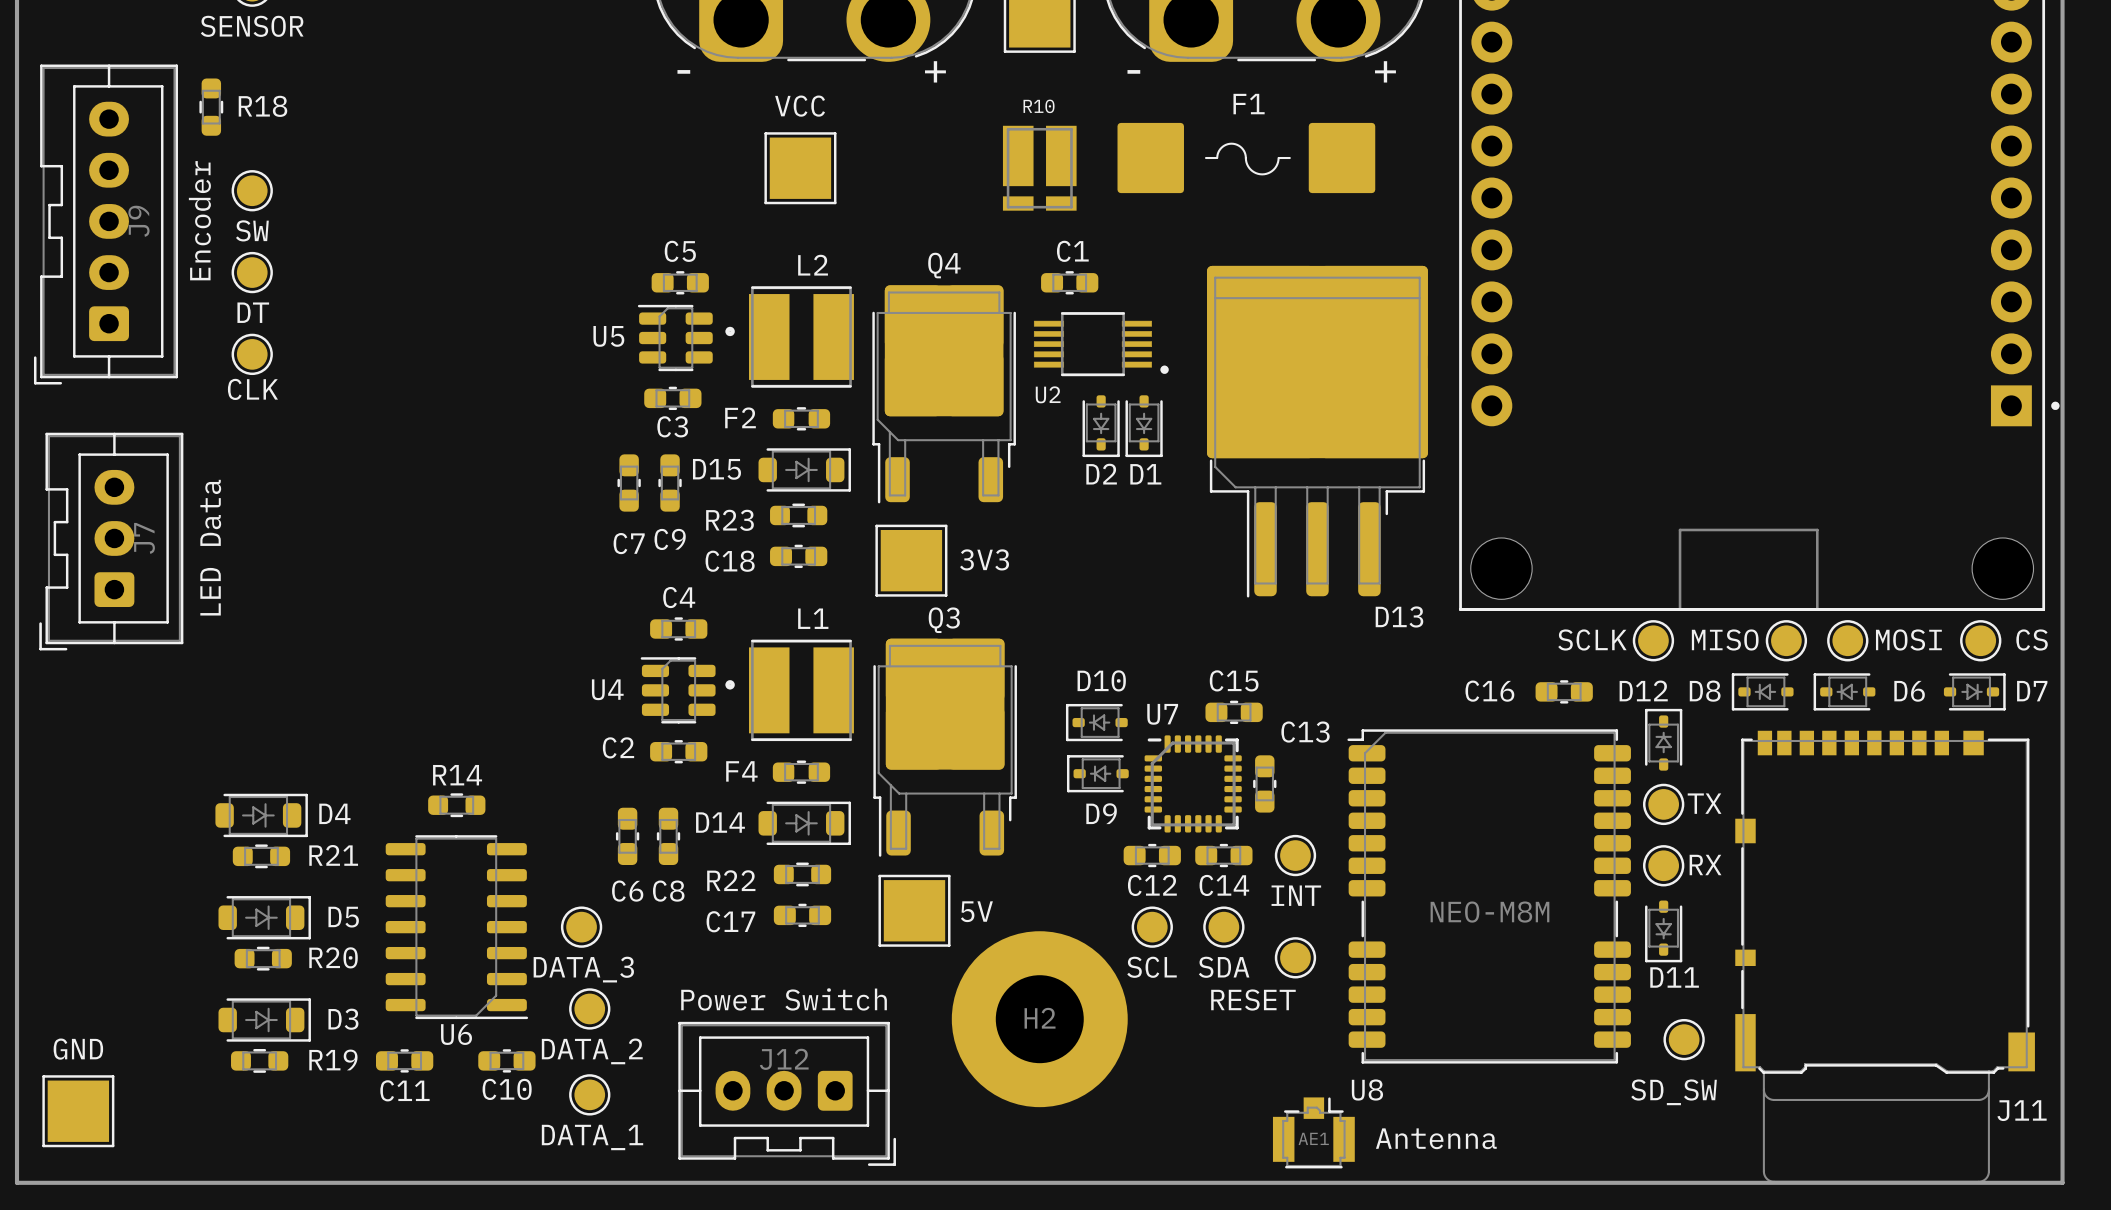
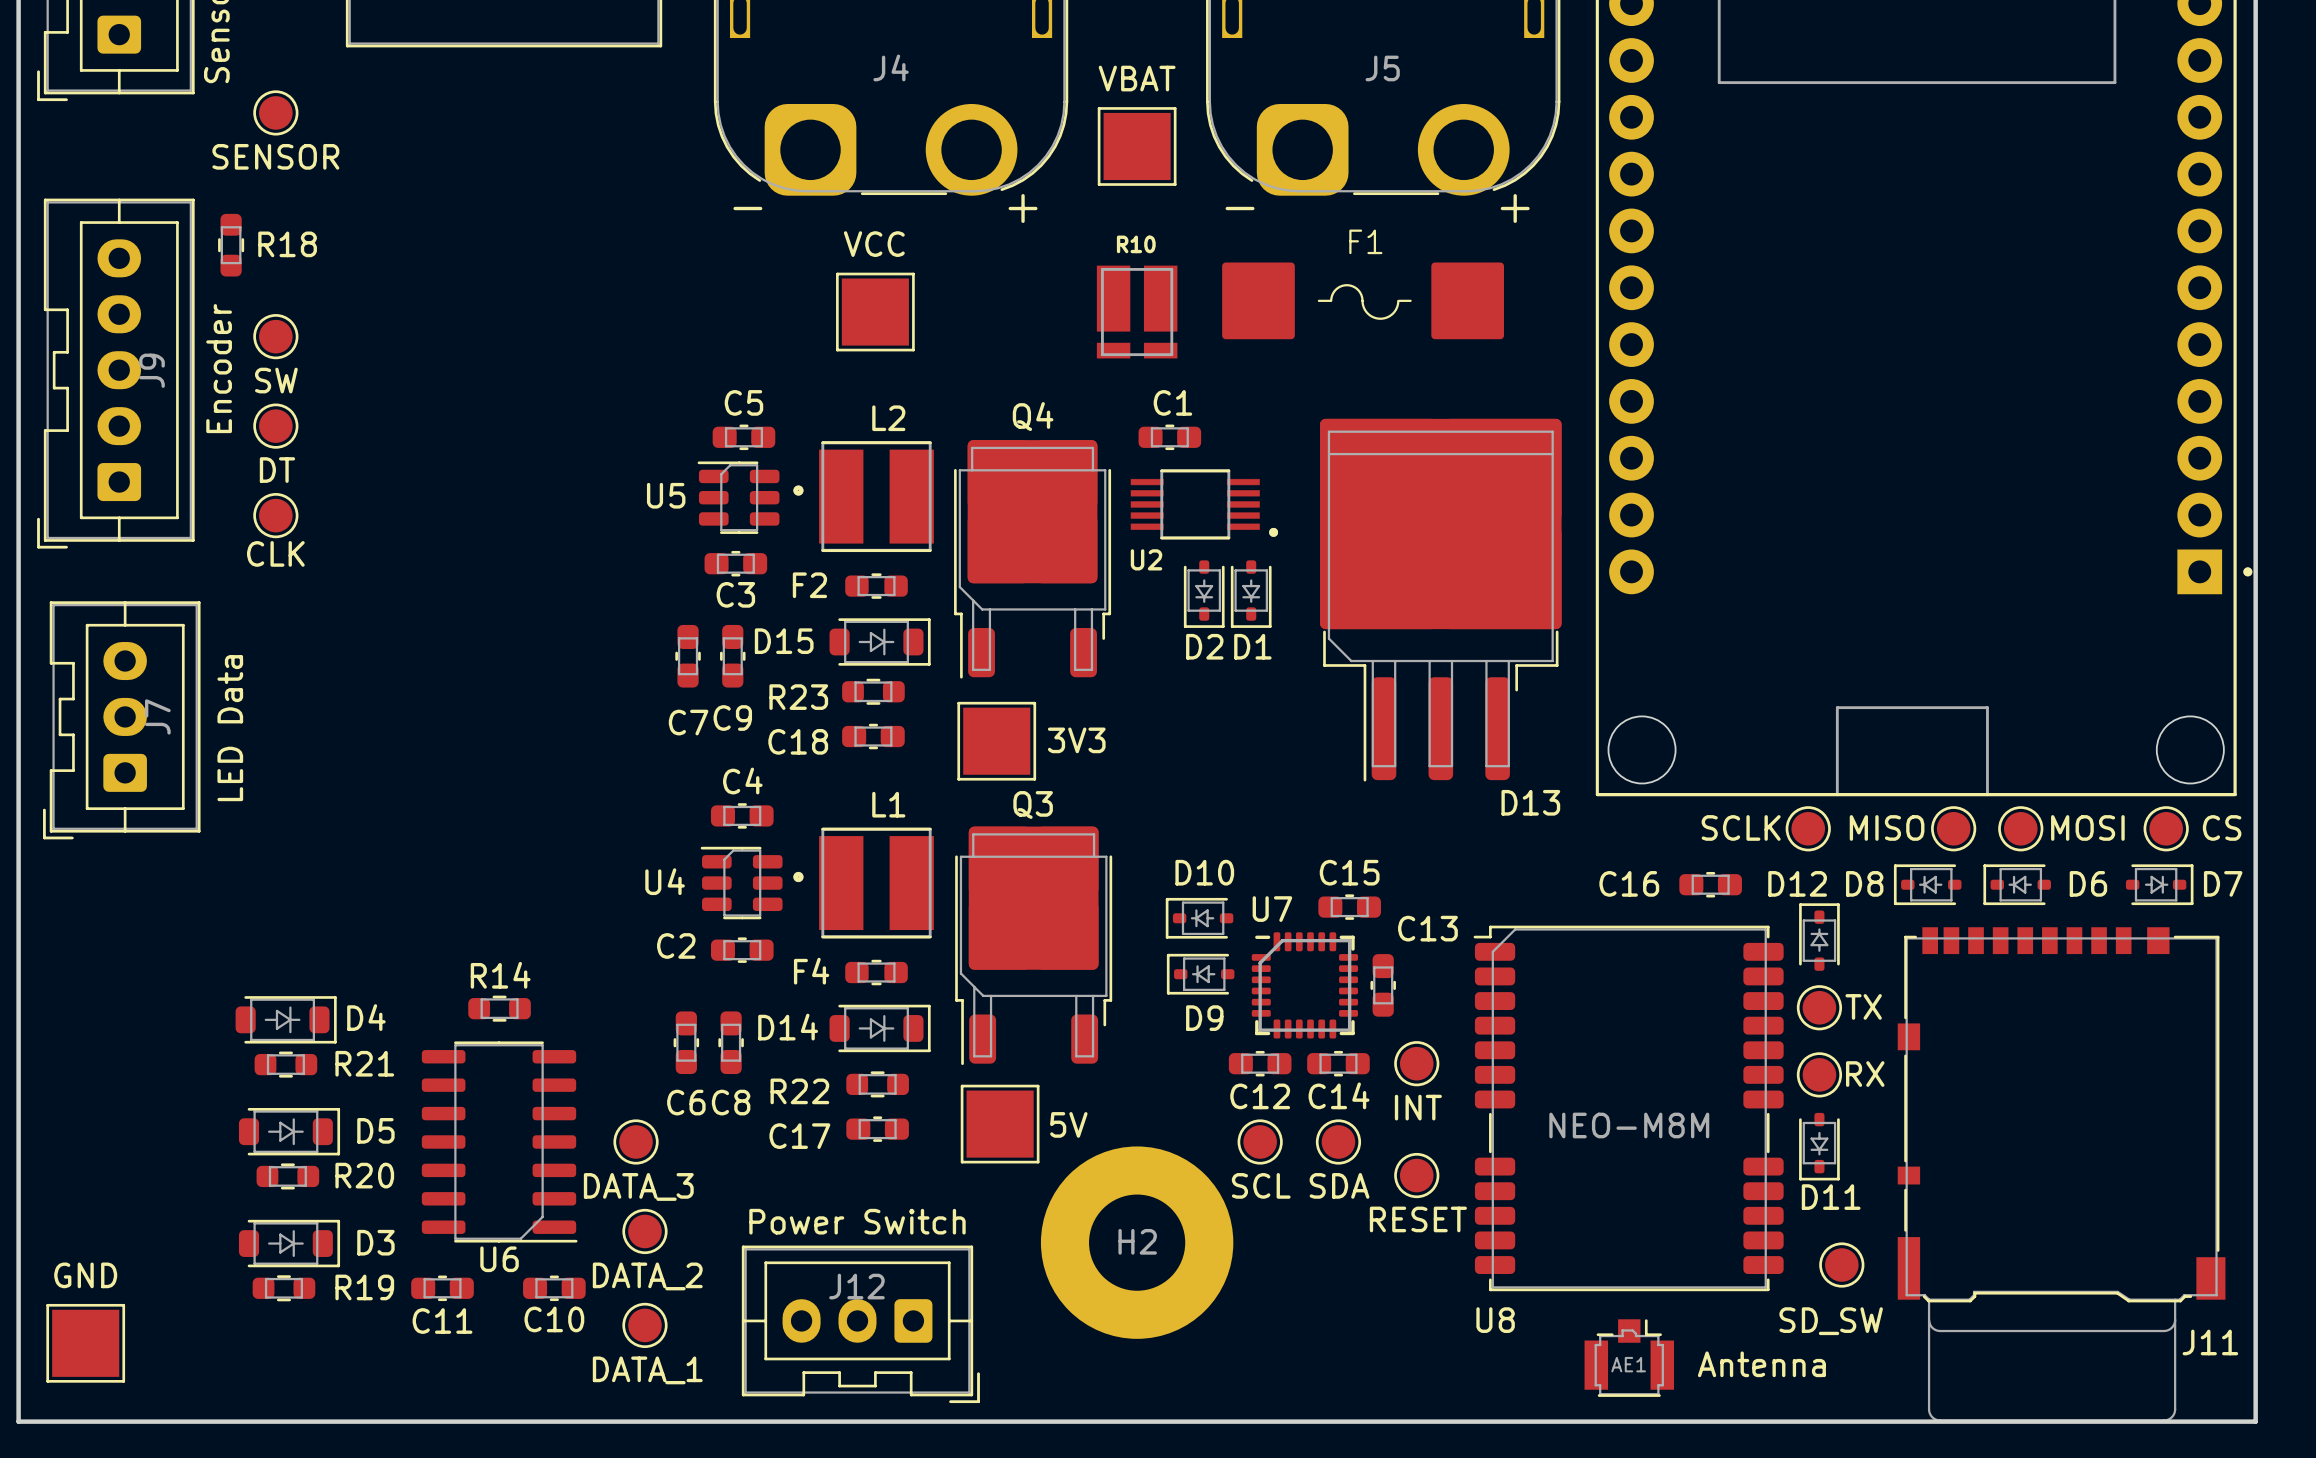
part value position: RESET (1253, 1000) -> RESET (1418, 1219)
AE1 position: (1313, 1132) -> (1629, 1358)

